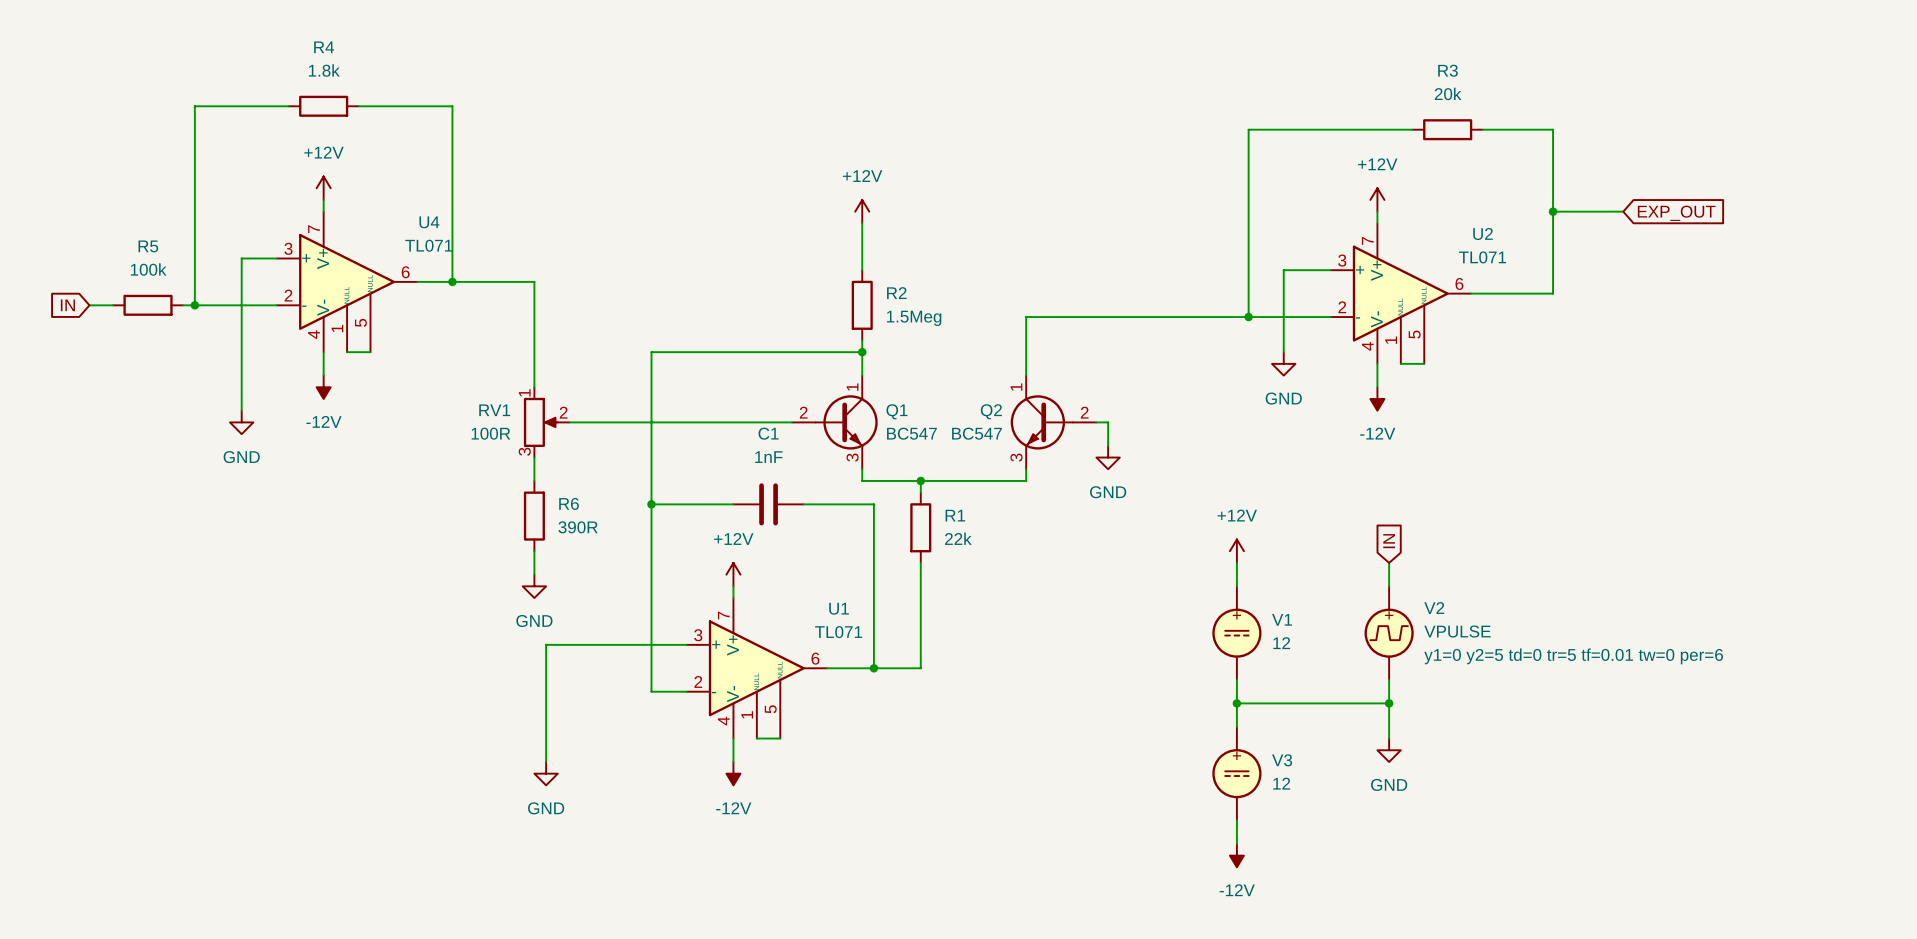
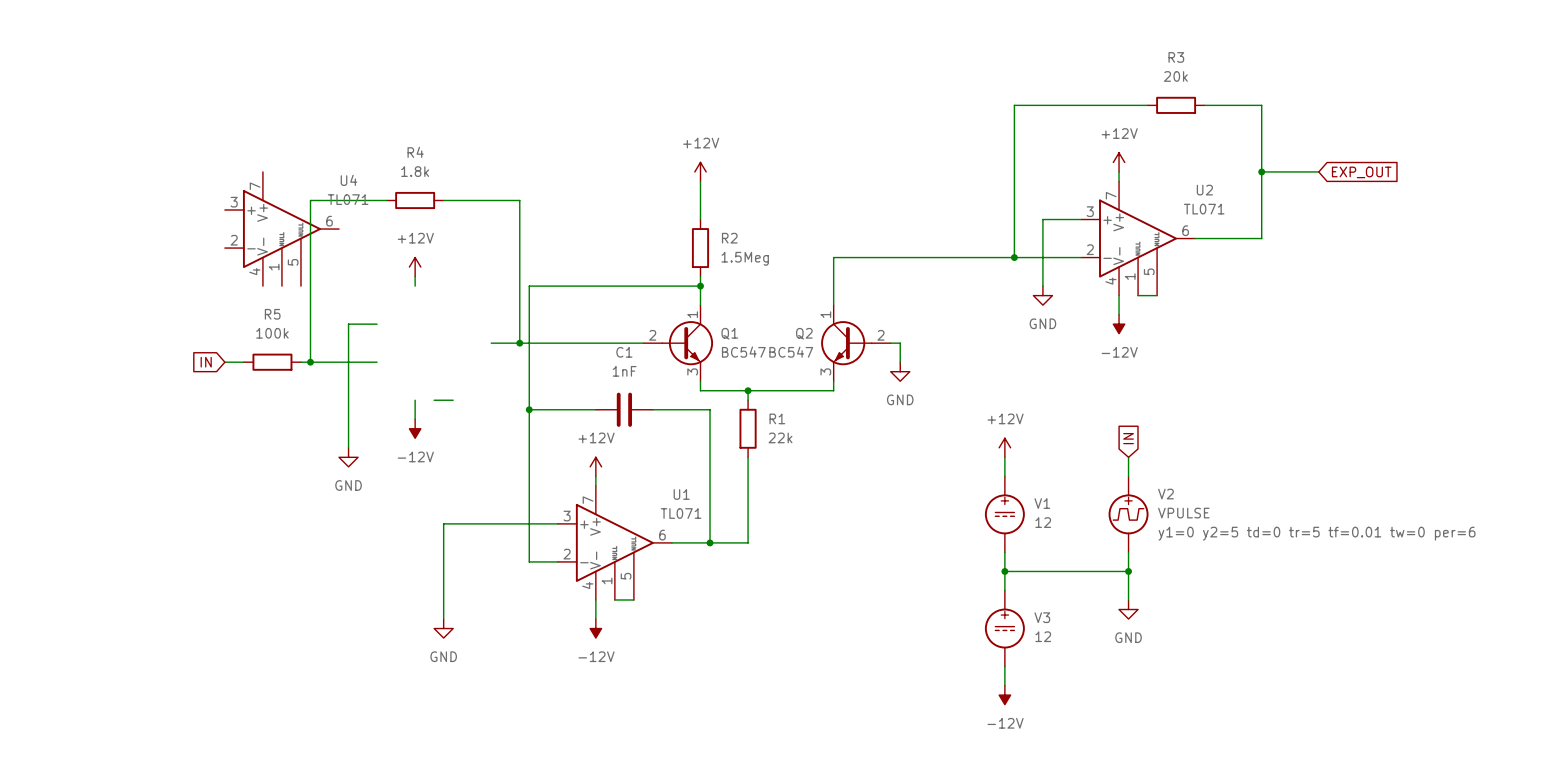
wire: (288, 106) (194, 106) (194, 305) -> none
R4 position: (323, 106) -> (415, 200)
wire: (358, 106) (452, 106) (452, 281) -> none
power symbol: +12V (323, 188) -> none
wire: (323, 199) (323, 211) -> none
wire: none -> (386, 200) (310, 200) (310, 362)
wire: none -> (443, 200) (519, 200) (519, 343)
wire: (276, 258) (241, 258) (241, 410) -> none
wire: (417, 281) (534, 281) (534, 387) -> none
junction: (452, 281) -> none
global label: IN (67, 305) -> none
wire: (89, 305) (112, 305) -> none
R5 position: (148, 305) -> (272, 362)
wire: (183, 305) (276, 305) -> none
junction: (194, 305) -> none
power symbol: none -> +12V (415, 267)
wire: none -> (415, 276) (415, 286)
wire: (323, 352) (323, 375) -> none
wire: (347, 352) (370, 352) -> (224, 362) (243, 362)
power symbol: -12V (323, 387) -> none
wire: none -> (377, 324) (348, 324) (348, 447)
power symbol: GND (241, 422) -> none
RV1: 100R (546, 422) -> none
wire: (569, 422) (604, 422) -> none
junction: none -> (519, 343)
global label: none -> IN (206, 362)
wire: none -> (300, 362) (377, 362)
junction: none -> (310, 362)
wire: (534, 457) (534, 480) -> (415, 400) (415, 419)
wire: none -> (434, 400) (453, 400)
R6: 390R (534, 516) -> none
power symbol: none -> -12V (415, 428)
wire: (534, 551) (534, 574) -> none
power symbol position: GND (534, 586) -> GND (348, 457)

